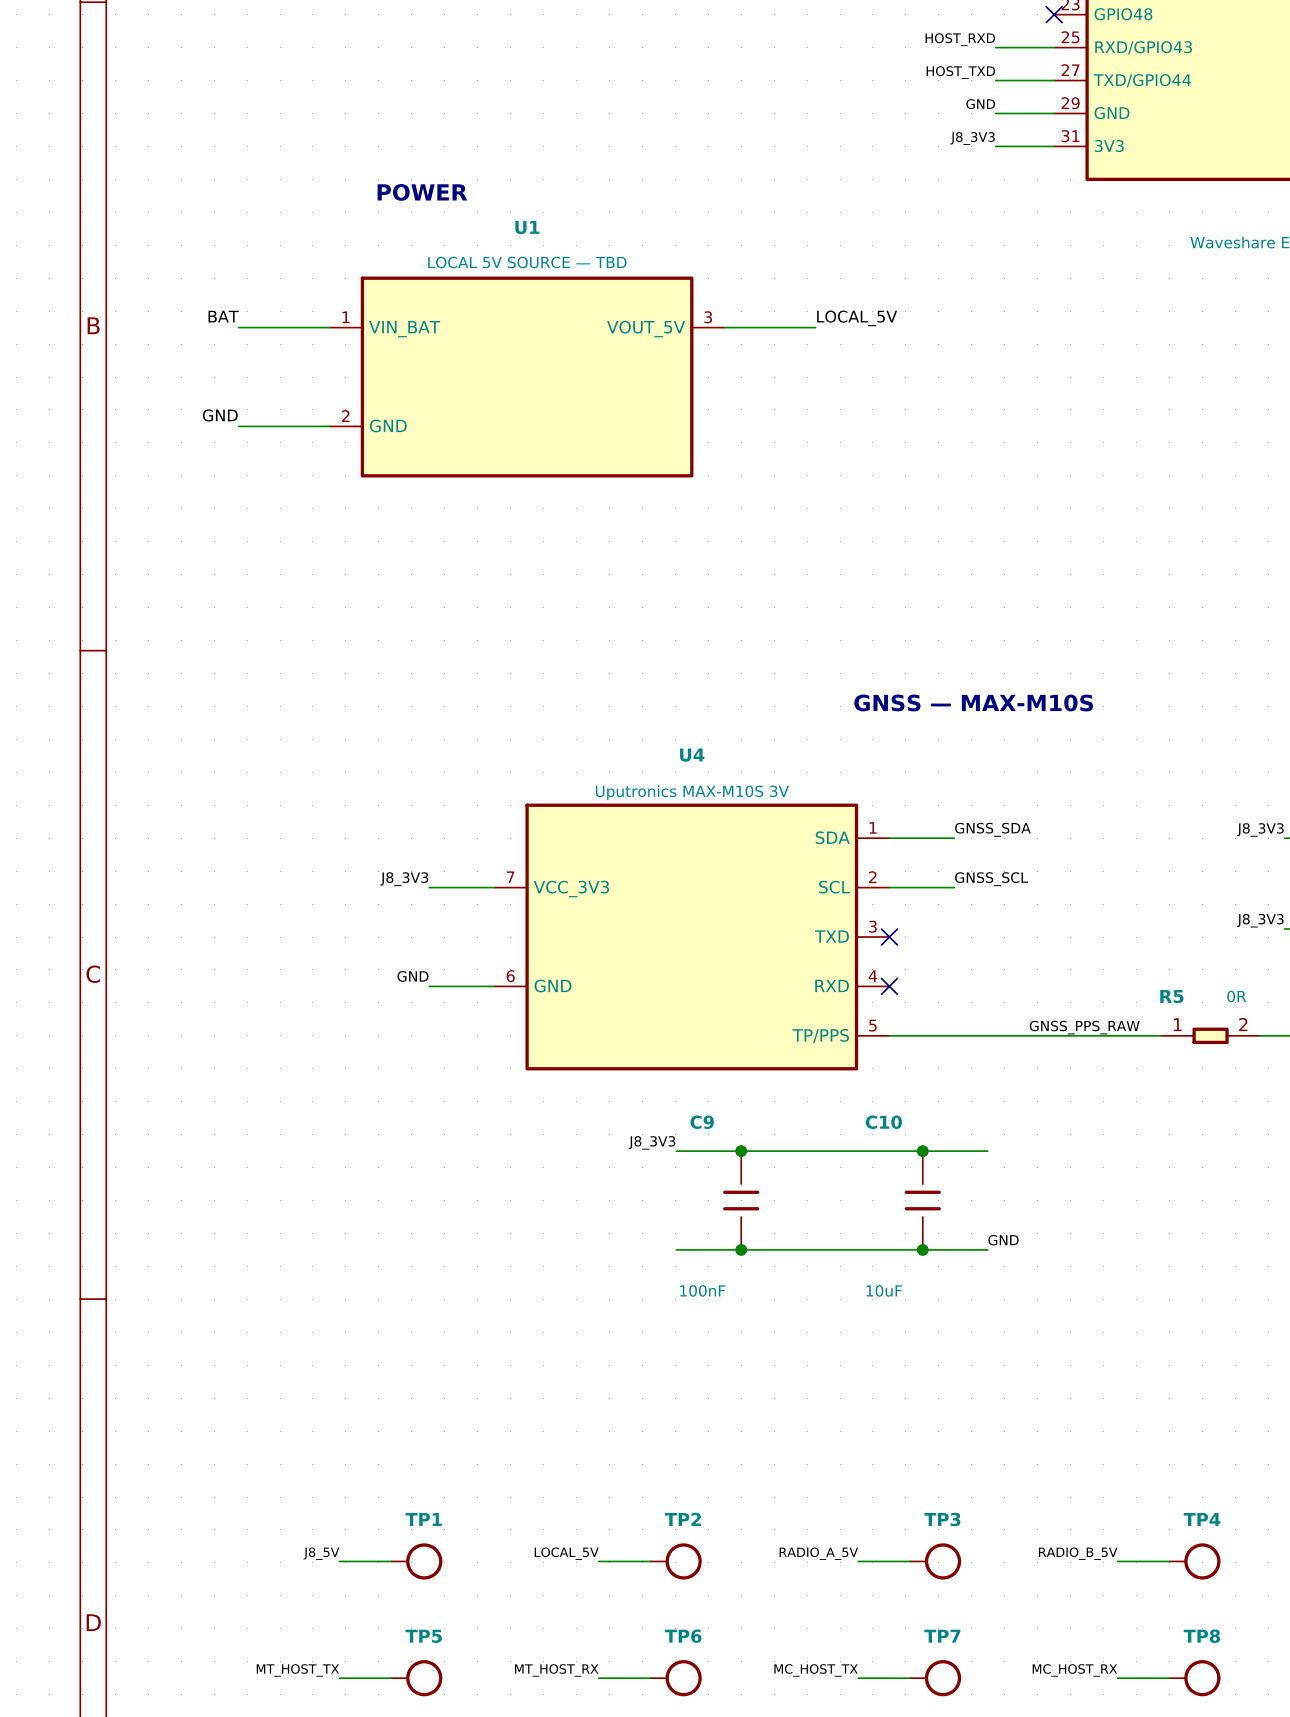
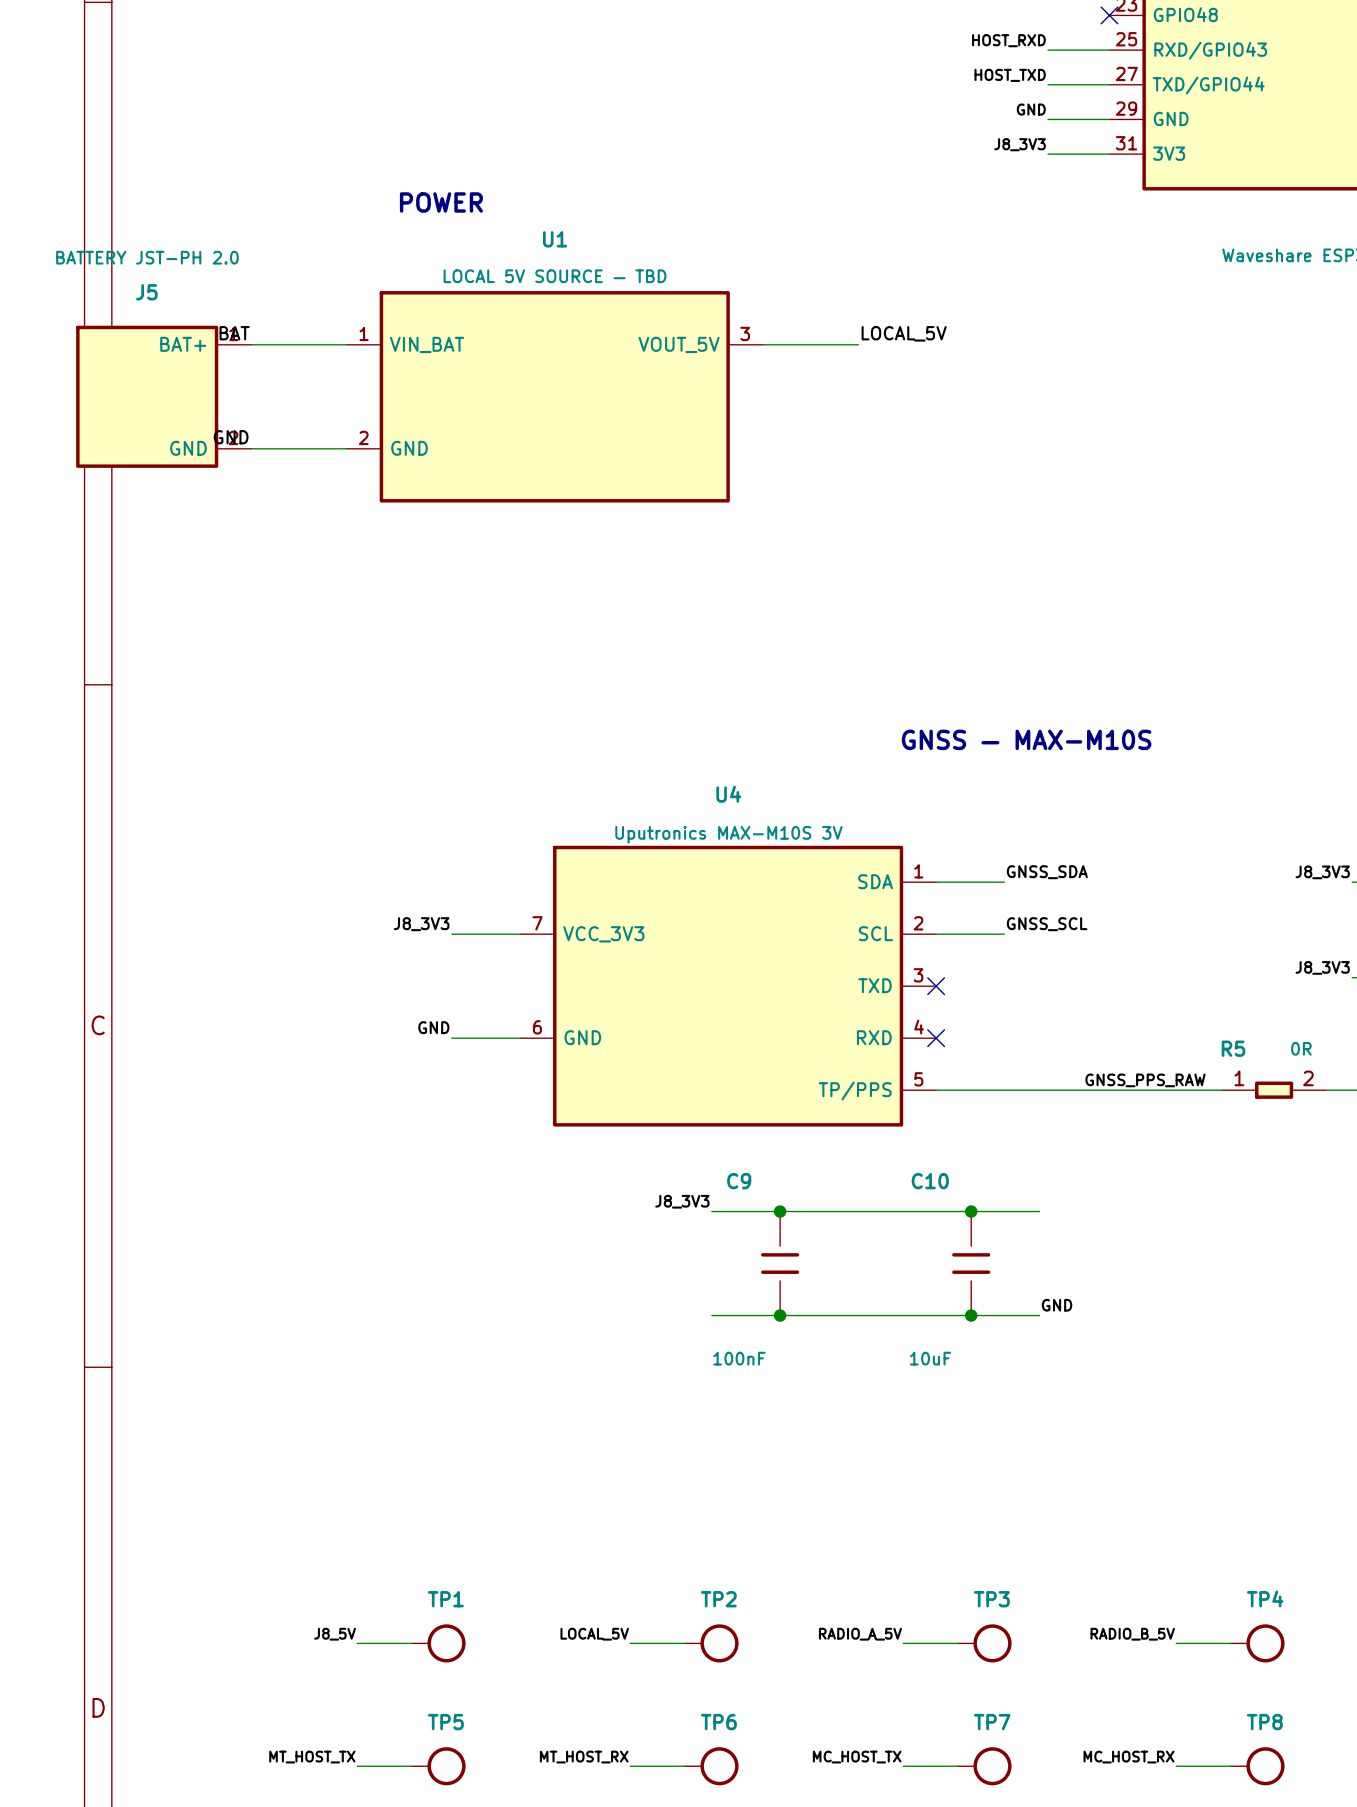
J5: none -> BATTERY JST-PH 2.0 (163, 396)

